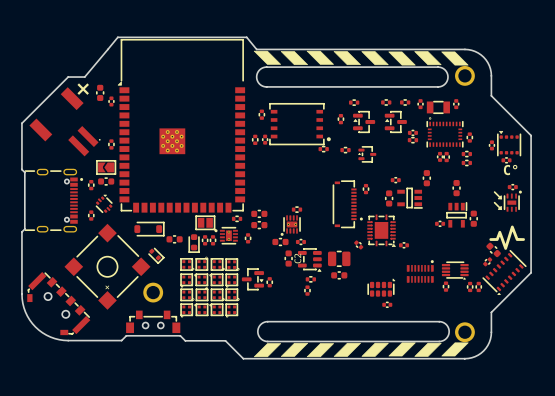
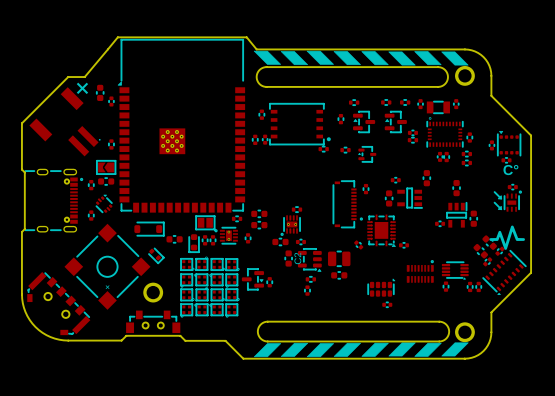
part: none -> (489, 242)
part: (493, 249) -> none
part: none -> (480, 251)
part: none -> (499, 251)

